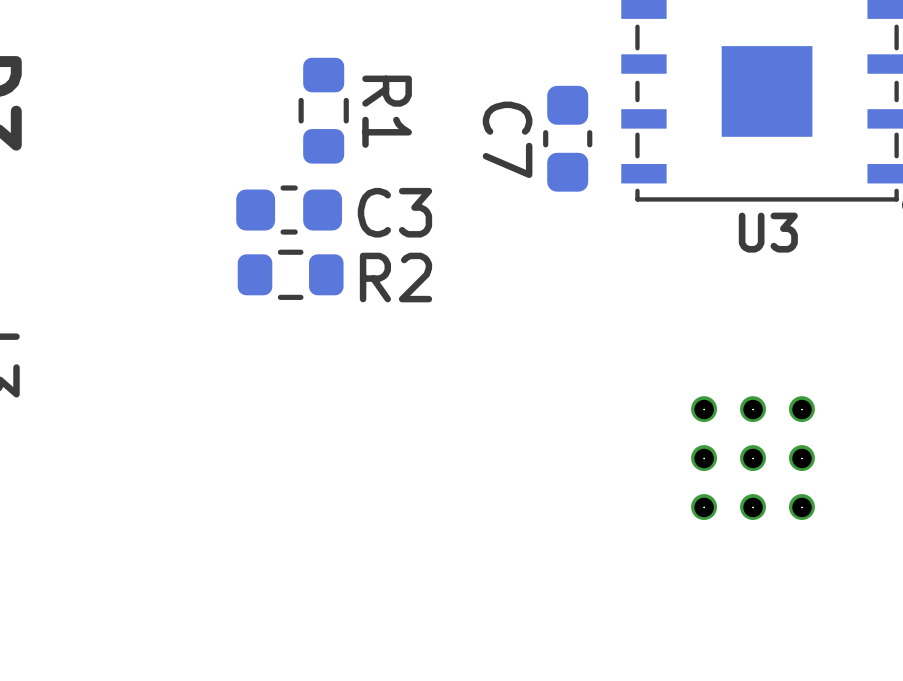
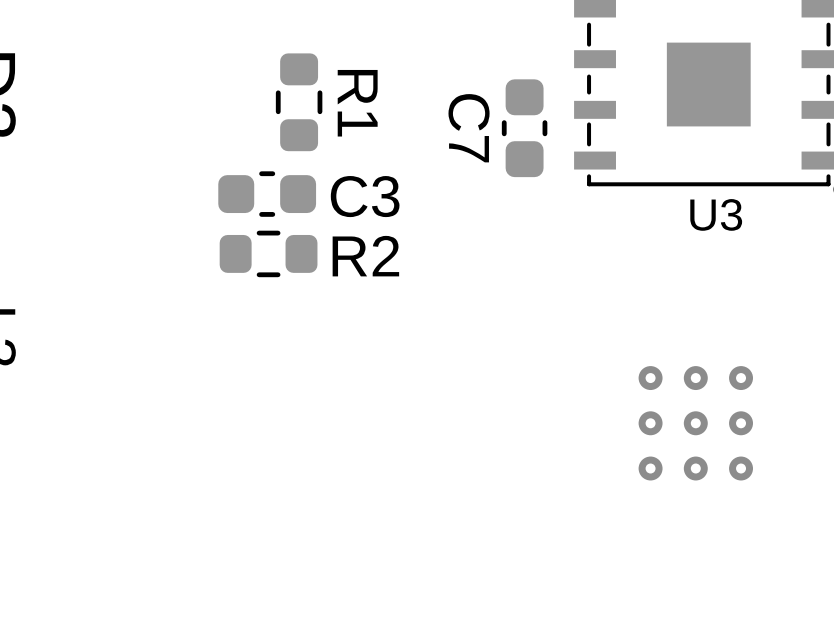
round board edge: [694, 399, 714, 420] -> none
round board edge: [743, 399, 763, 420] -> none
round board edge: [792, 399, 812, 420] -> none
round board edge: [694, 448, 714, 469] -> none
round board edge: [743, 448, 763, 469] -> none
round board edge: [792, 448, 812, 469] -> none
round board edge: [694, 497, 714, 518] -> none
round board edge: [743, 497, 763, 518] -> none
round board edge: [792, 497, 812, 518] -> none

